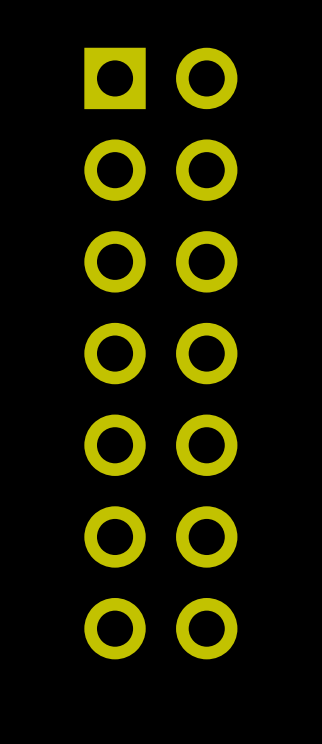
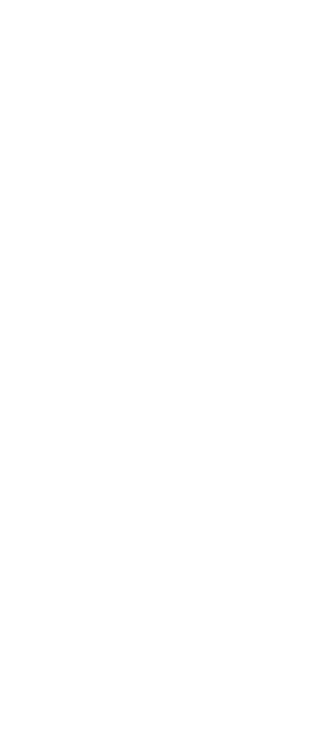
part: (160, 353) -> none

